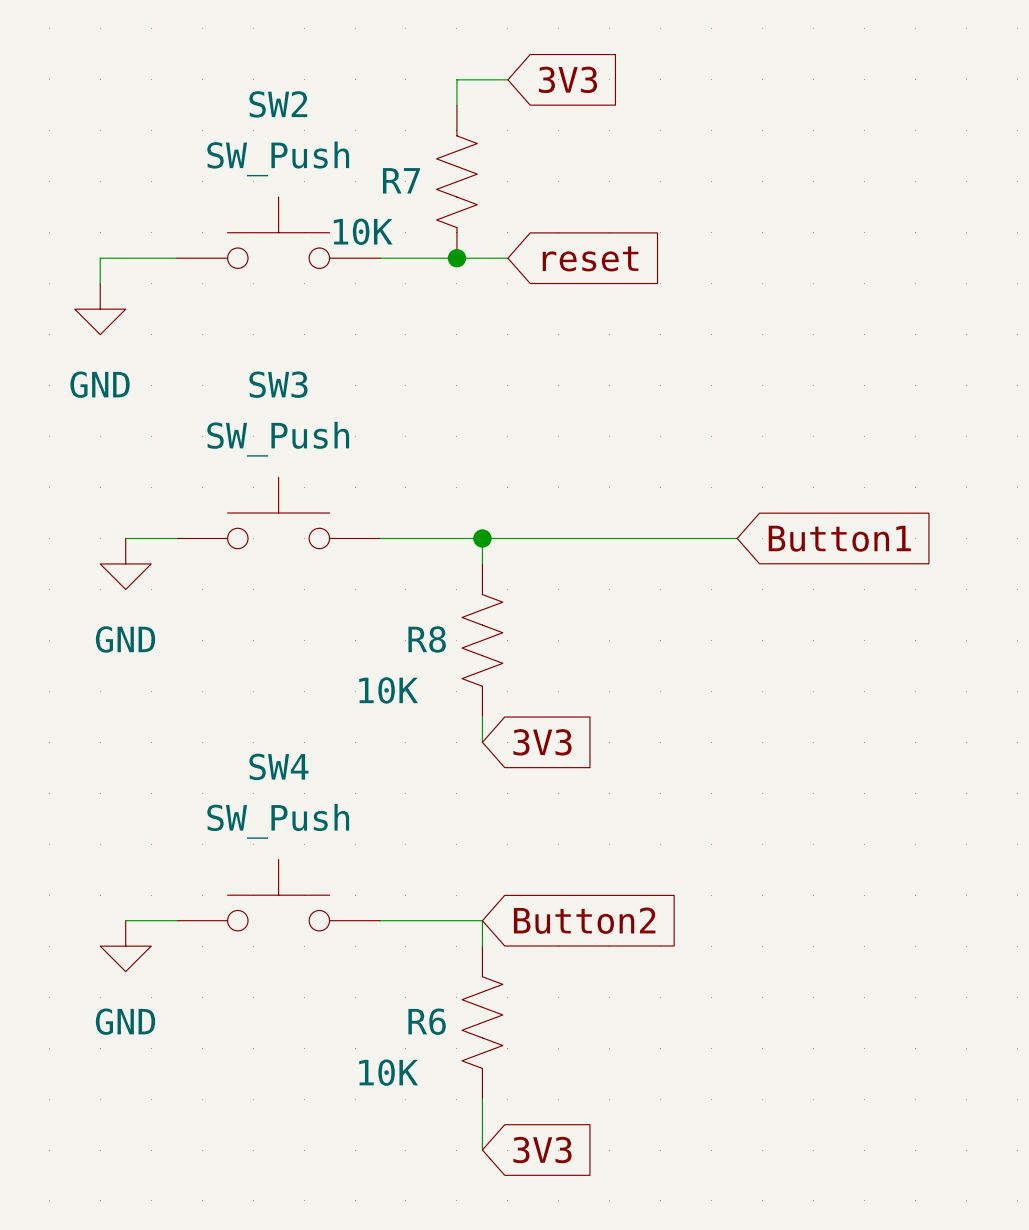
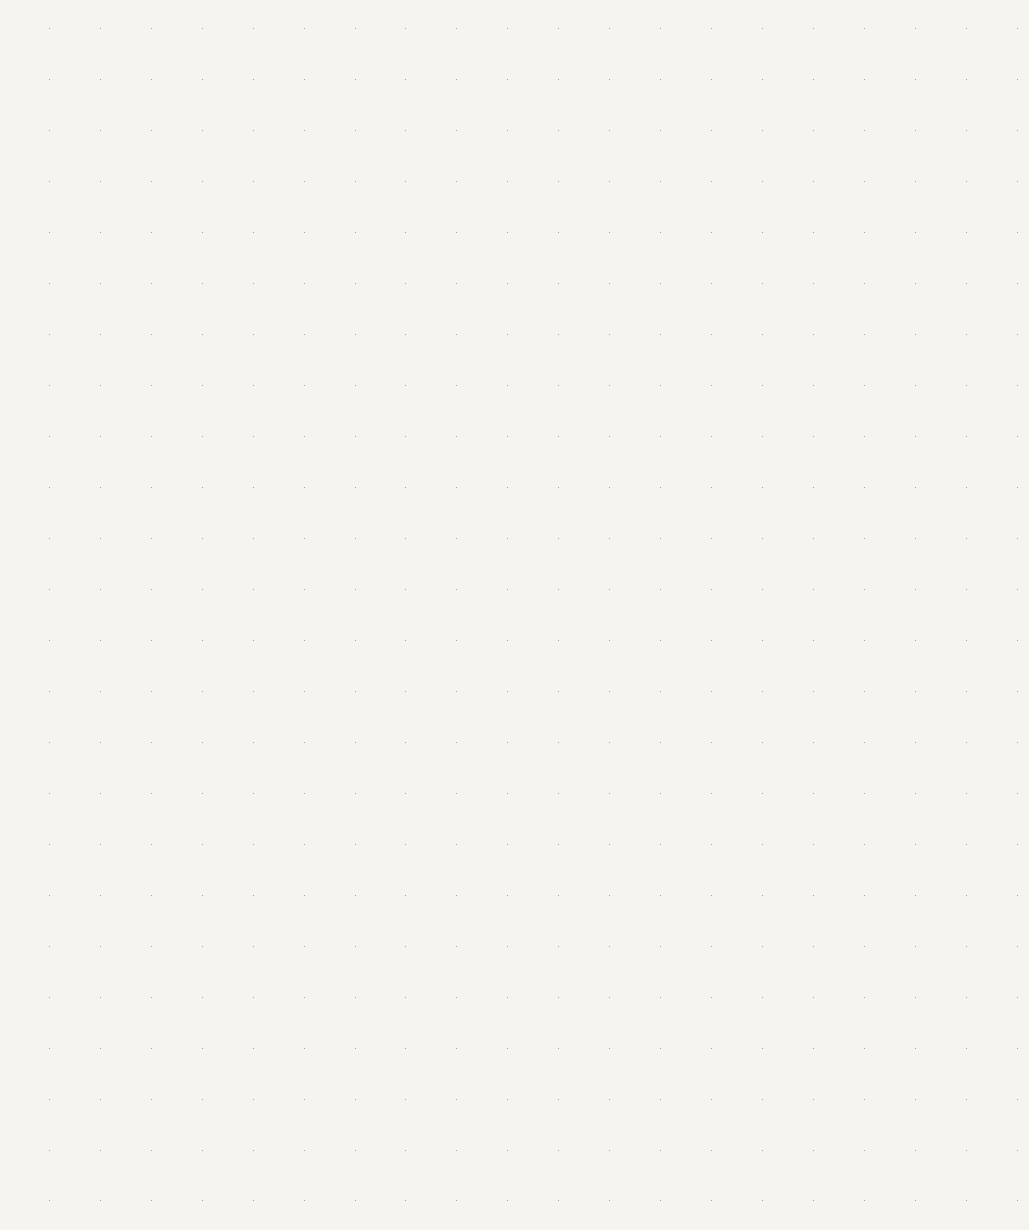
wire: (507, 79) (456, 79) (456, 105) -> none
global label: 3V3 (567, 79) -> none
R7: 10K (456, 181) -> none
SW2: SW_Push (278, 232) -> none
wire: (176, 258) (100, 258) (100, 283) -> none
wire: (380, 258) (507, 258) -> none
junction: (456, 258) -> none
global label: reset (590, 258) -> none
power symbol: GND (100, 309) -> none
SW3: SW_Push (278, 513) -> none
wire: (125, 538) (176, 538) -> none
wire: (380, 538) (737, 538) -> none
wire: (482, 538) (482, 563) -> none
junction: (482, 538) -> none
global label: Button1 (839, 538) -> none
power symbol: GND (125, 563) -> none
R8: 10K (482, 640) -> none
wire: (482, 716) (482, 742) -> none
global label: 3V3 (542, 742) -> none
SW4: SW_Push (278, 895) -> none
wire: (125, 920) (176, 920) -> none
wire: (380, 920) (482, 920) (482, 946) -> none
global label: Button2 (584, 920) -> none
power symbol: GND (125, 946) -> none
R6: 10K (482, 1022) -> none
wire: (482, 1099) (482, 1150) -> none
global label: 3V3 (542, 1150) -> none

